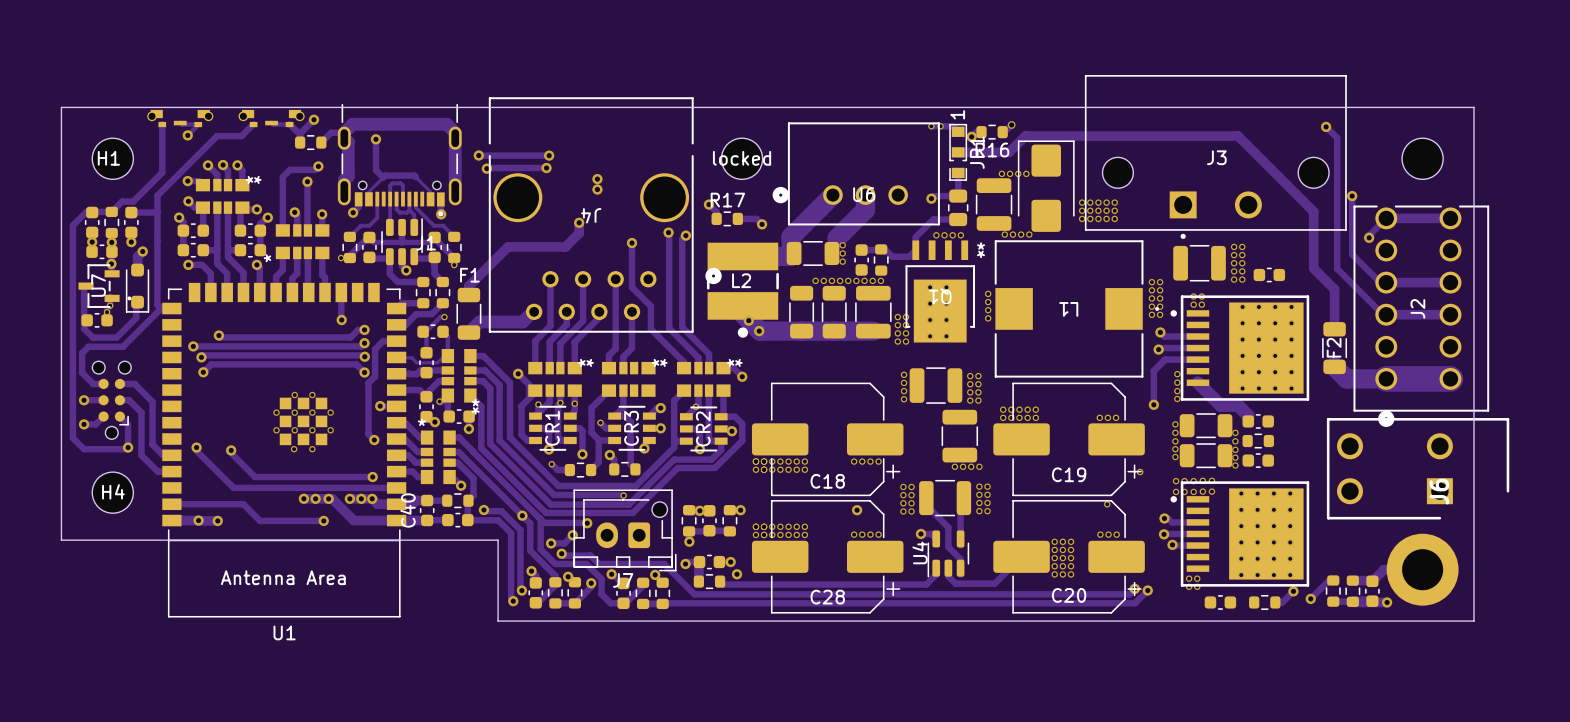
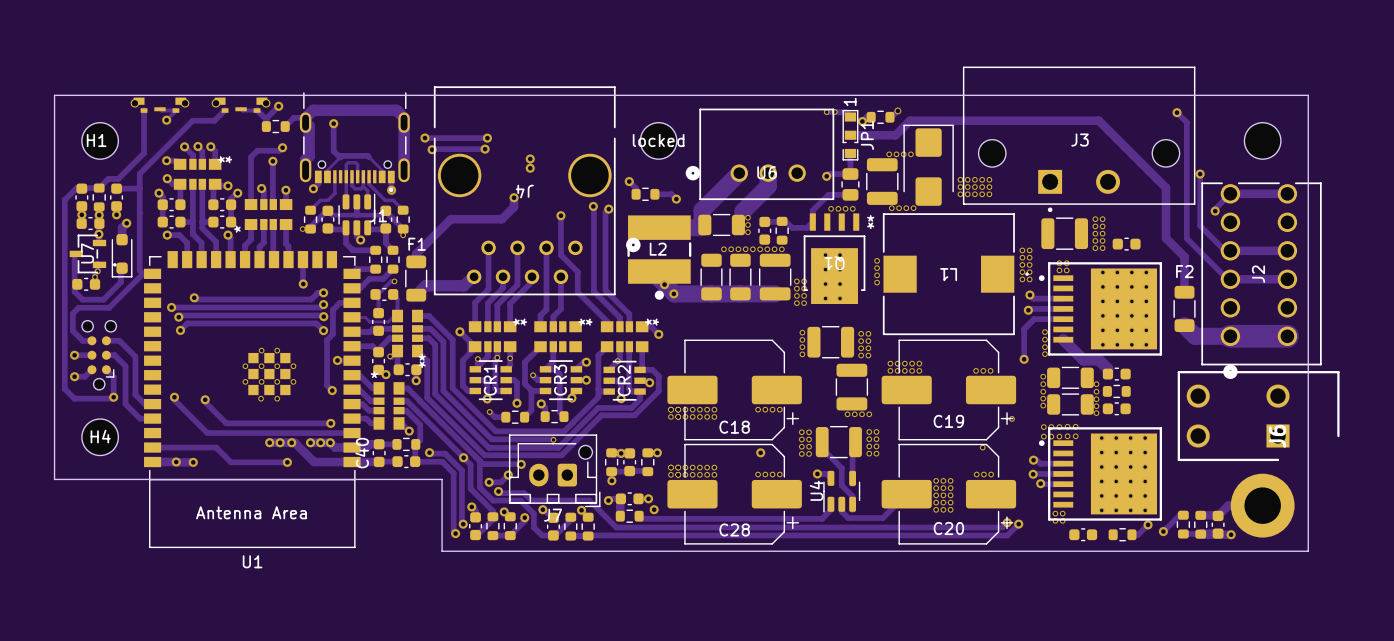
R16 name: R16 (992, 150) -> none
R17 name: R17 (727, 200) -> none
F2 name rotation: 0° (1334, 347) -> 90° clockwise (1184, 271)
F2 name position: F2 (1334, 347) -> F2 (1184, 271)

